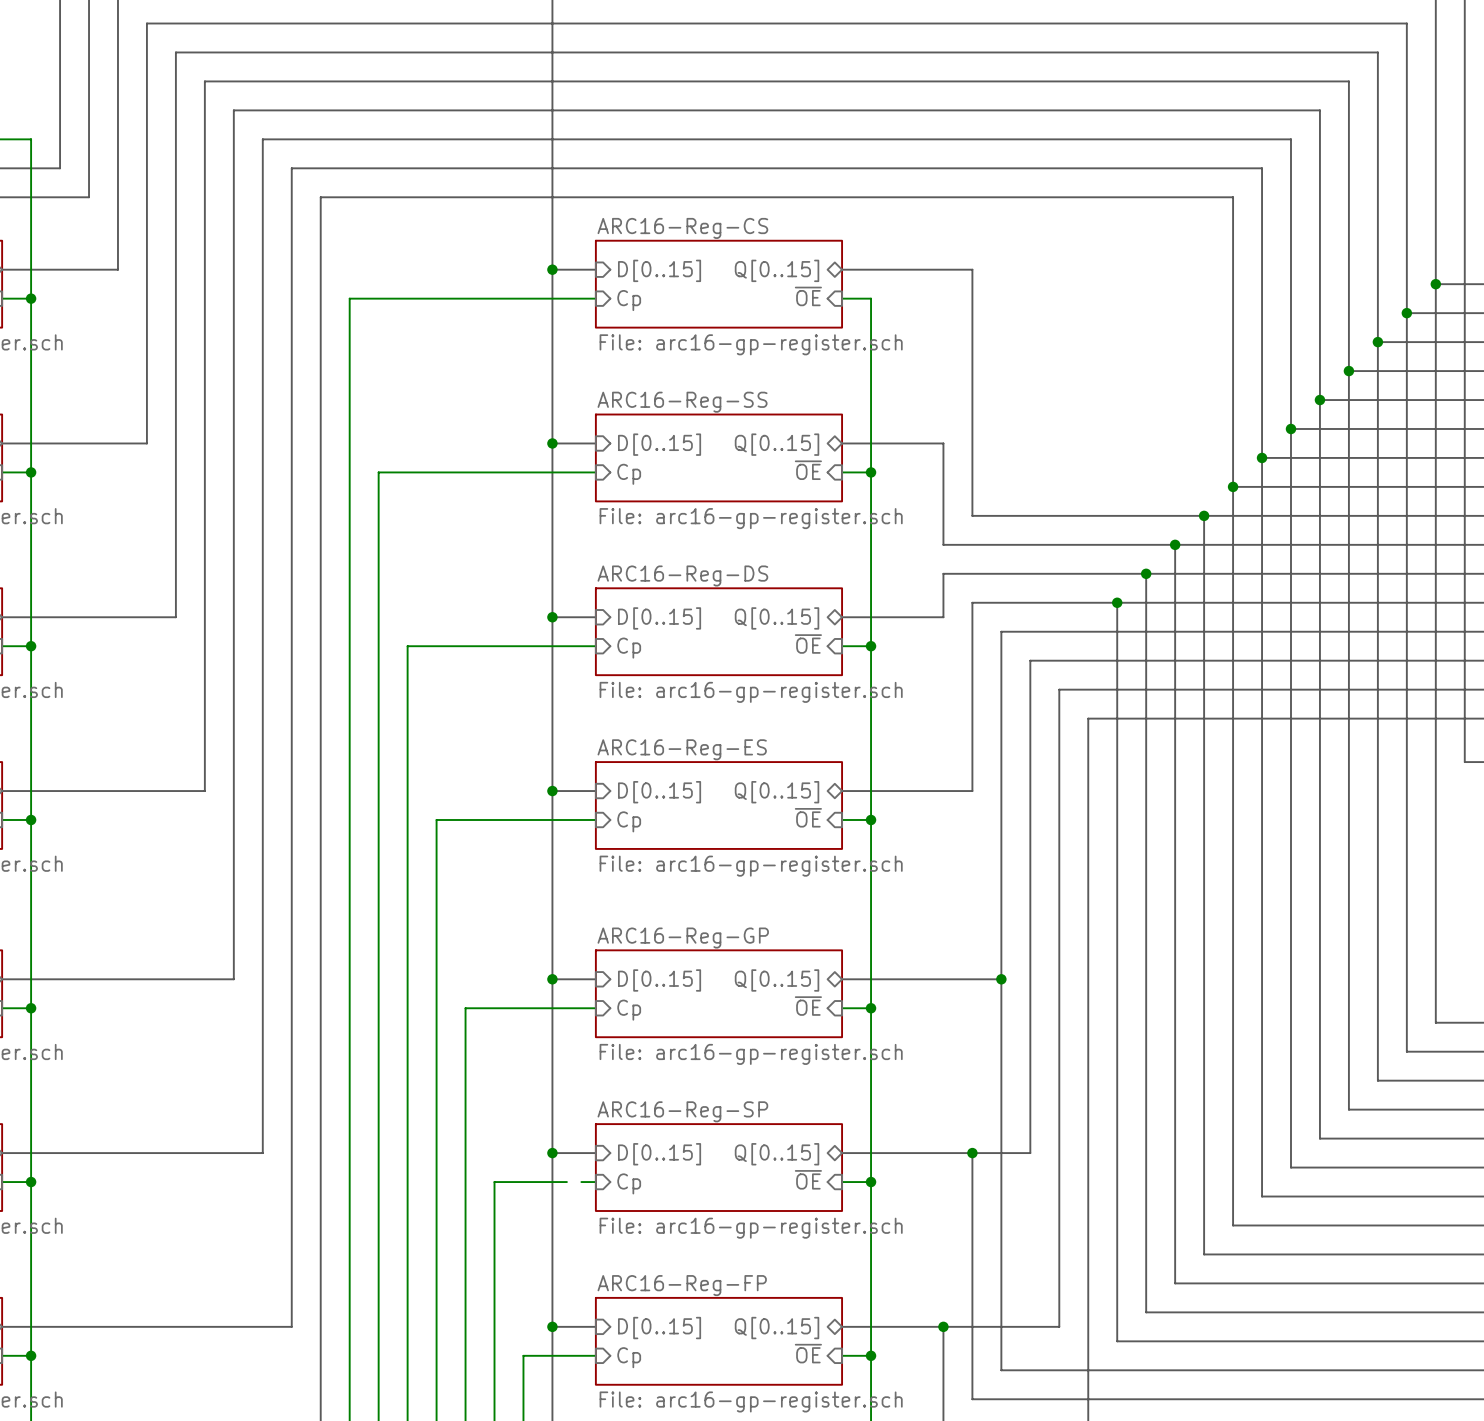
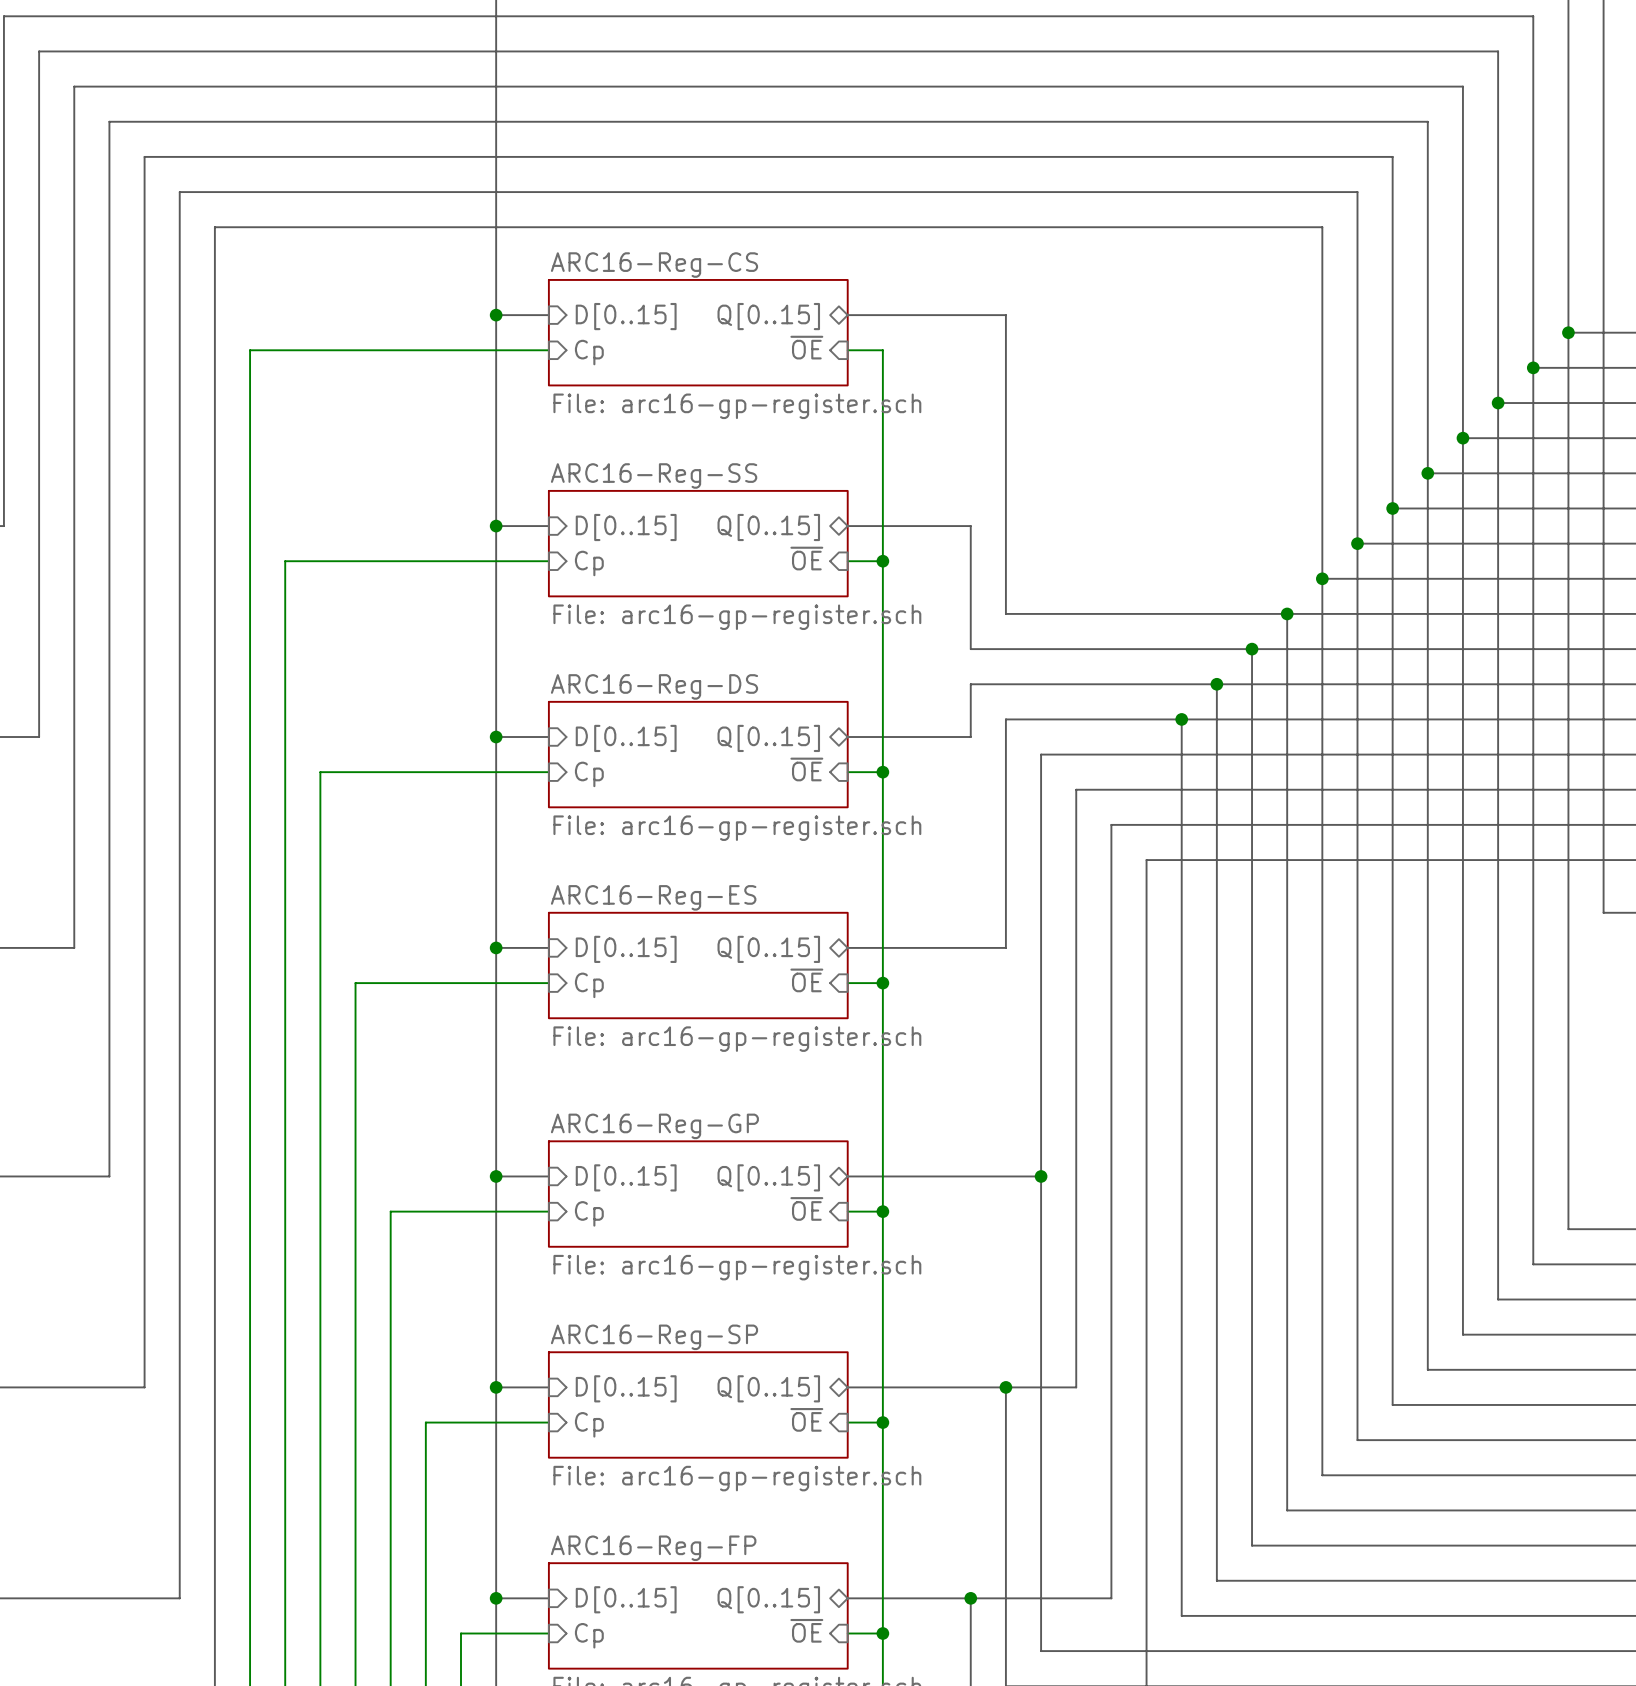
wire: none -> (513, 1422) (531, 1422)

